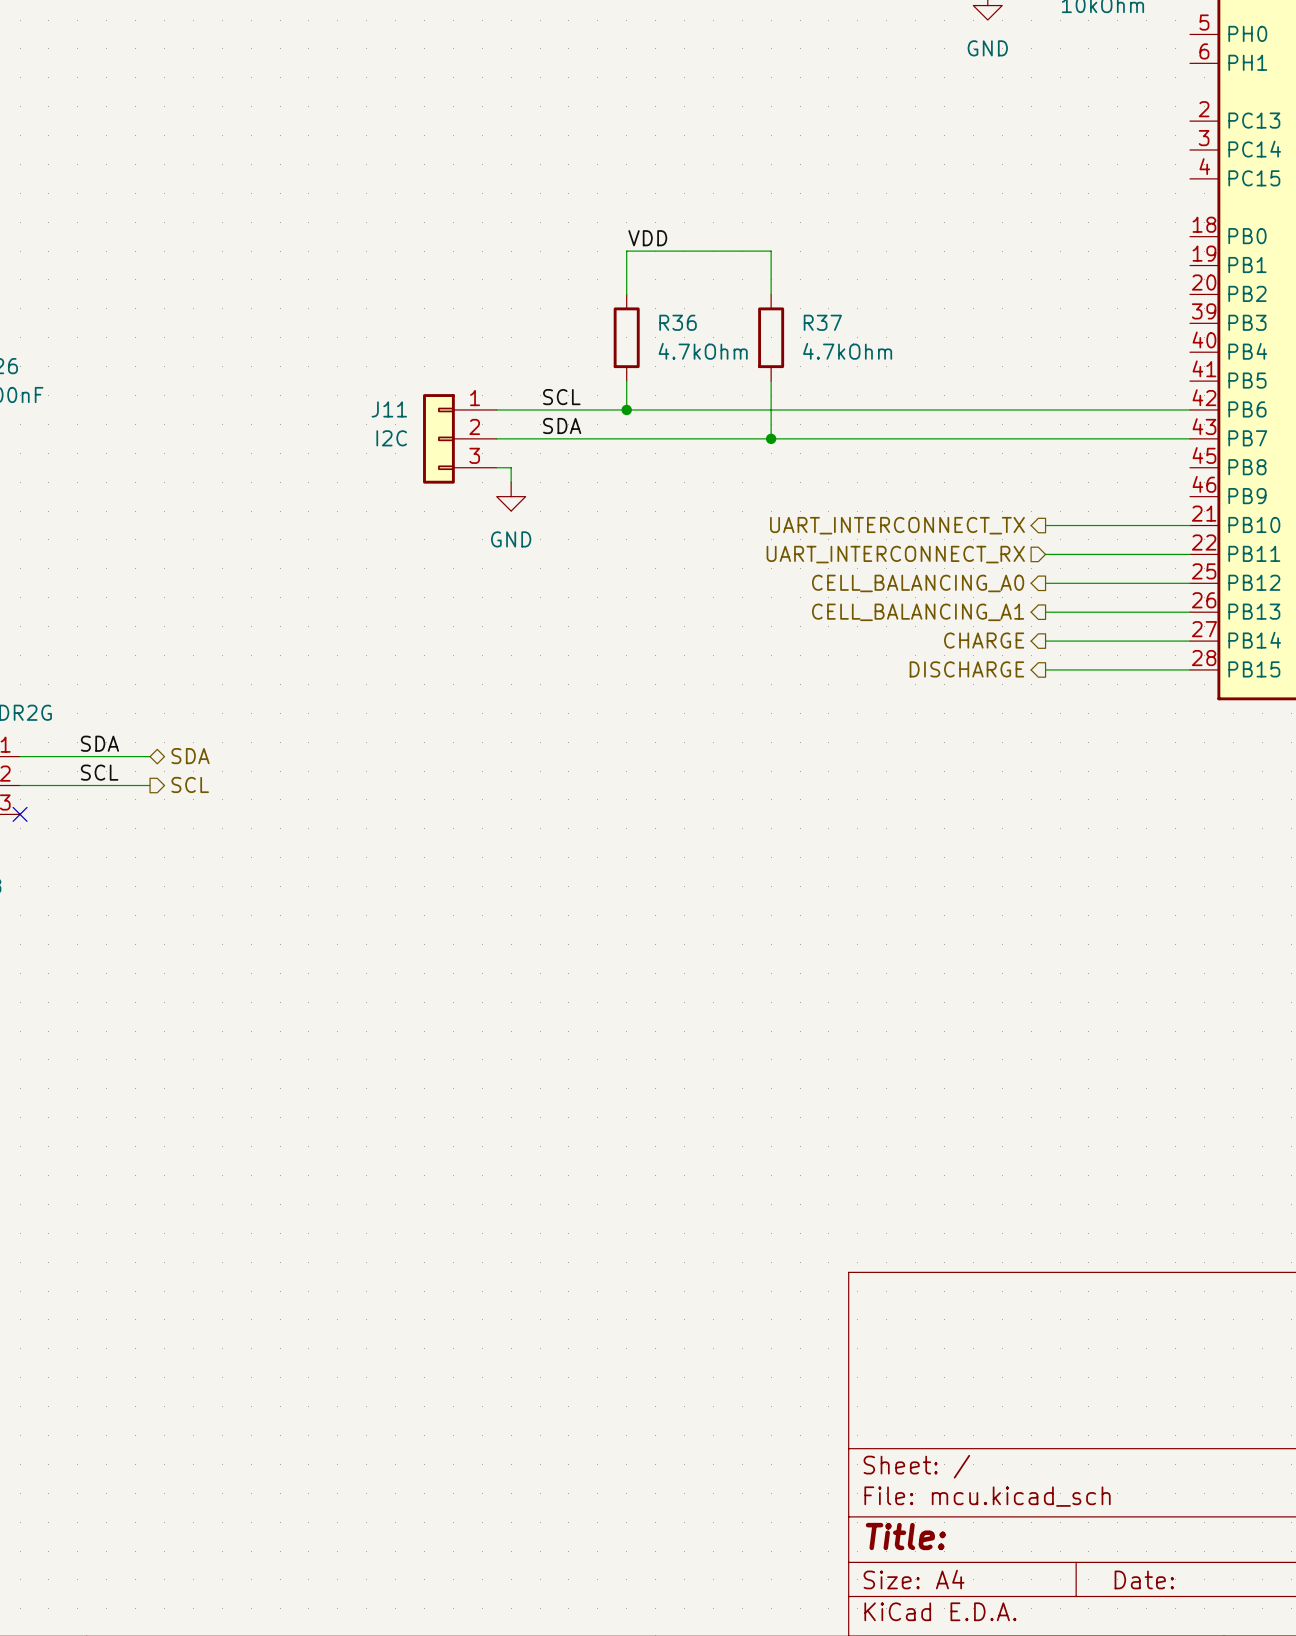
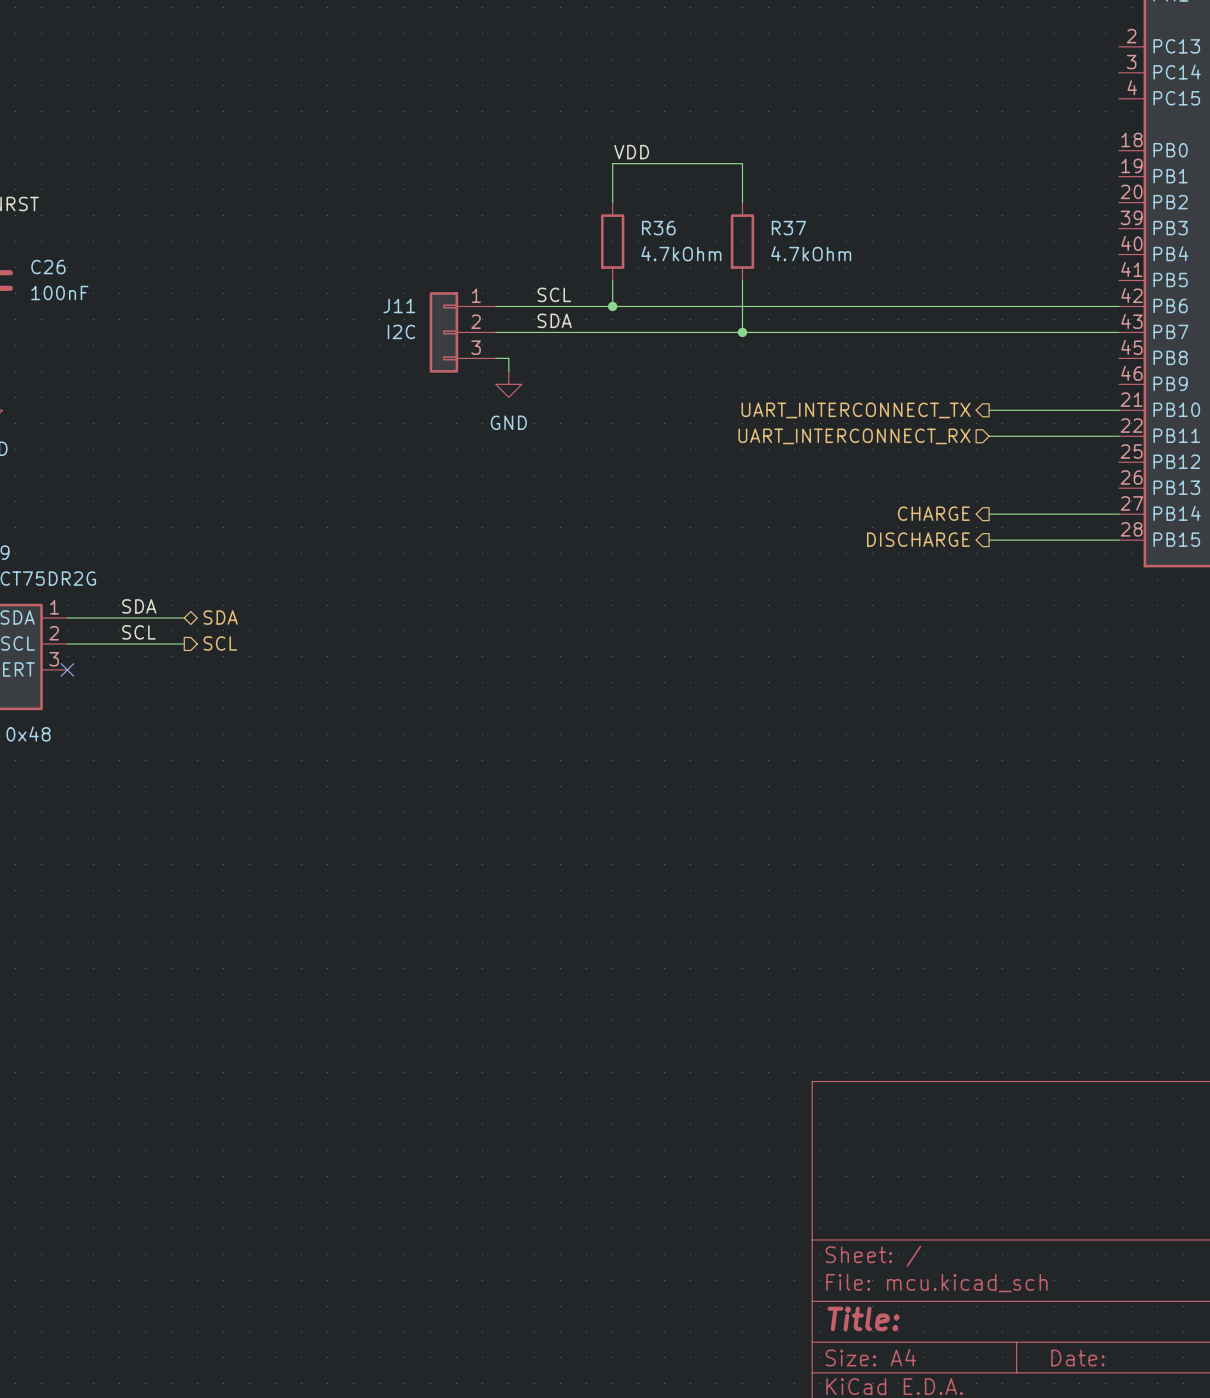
hierarchical label: CELL_BALANCING_A0 (918, 583) -> none
wire: (1045, 583) (1189, 583) -> none
hierarchical label: CELL_BALANCING_A1 (918, 612) -> none
wire: (1045, 612) (1189, 612) -> none

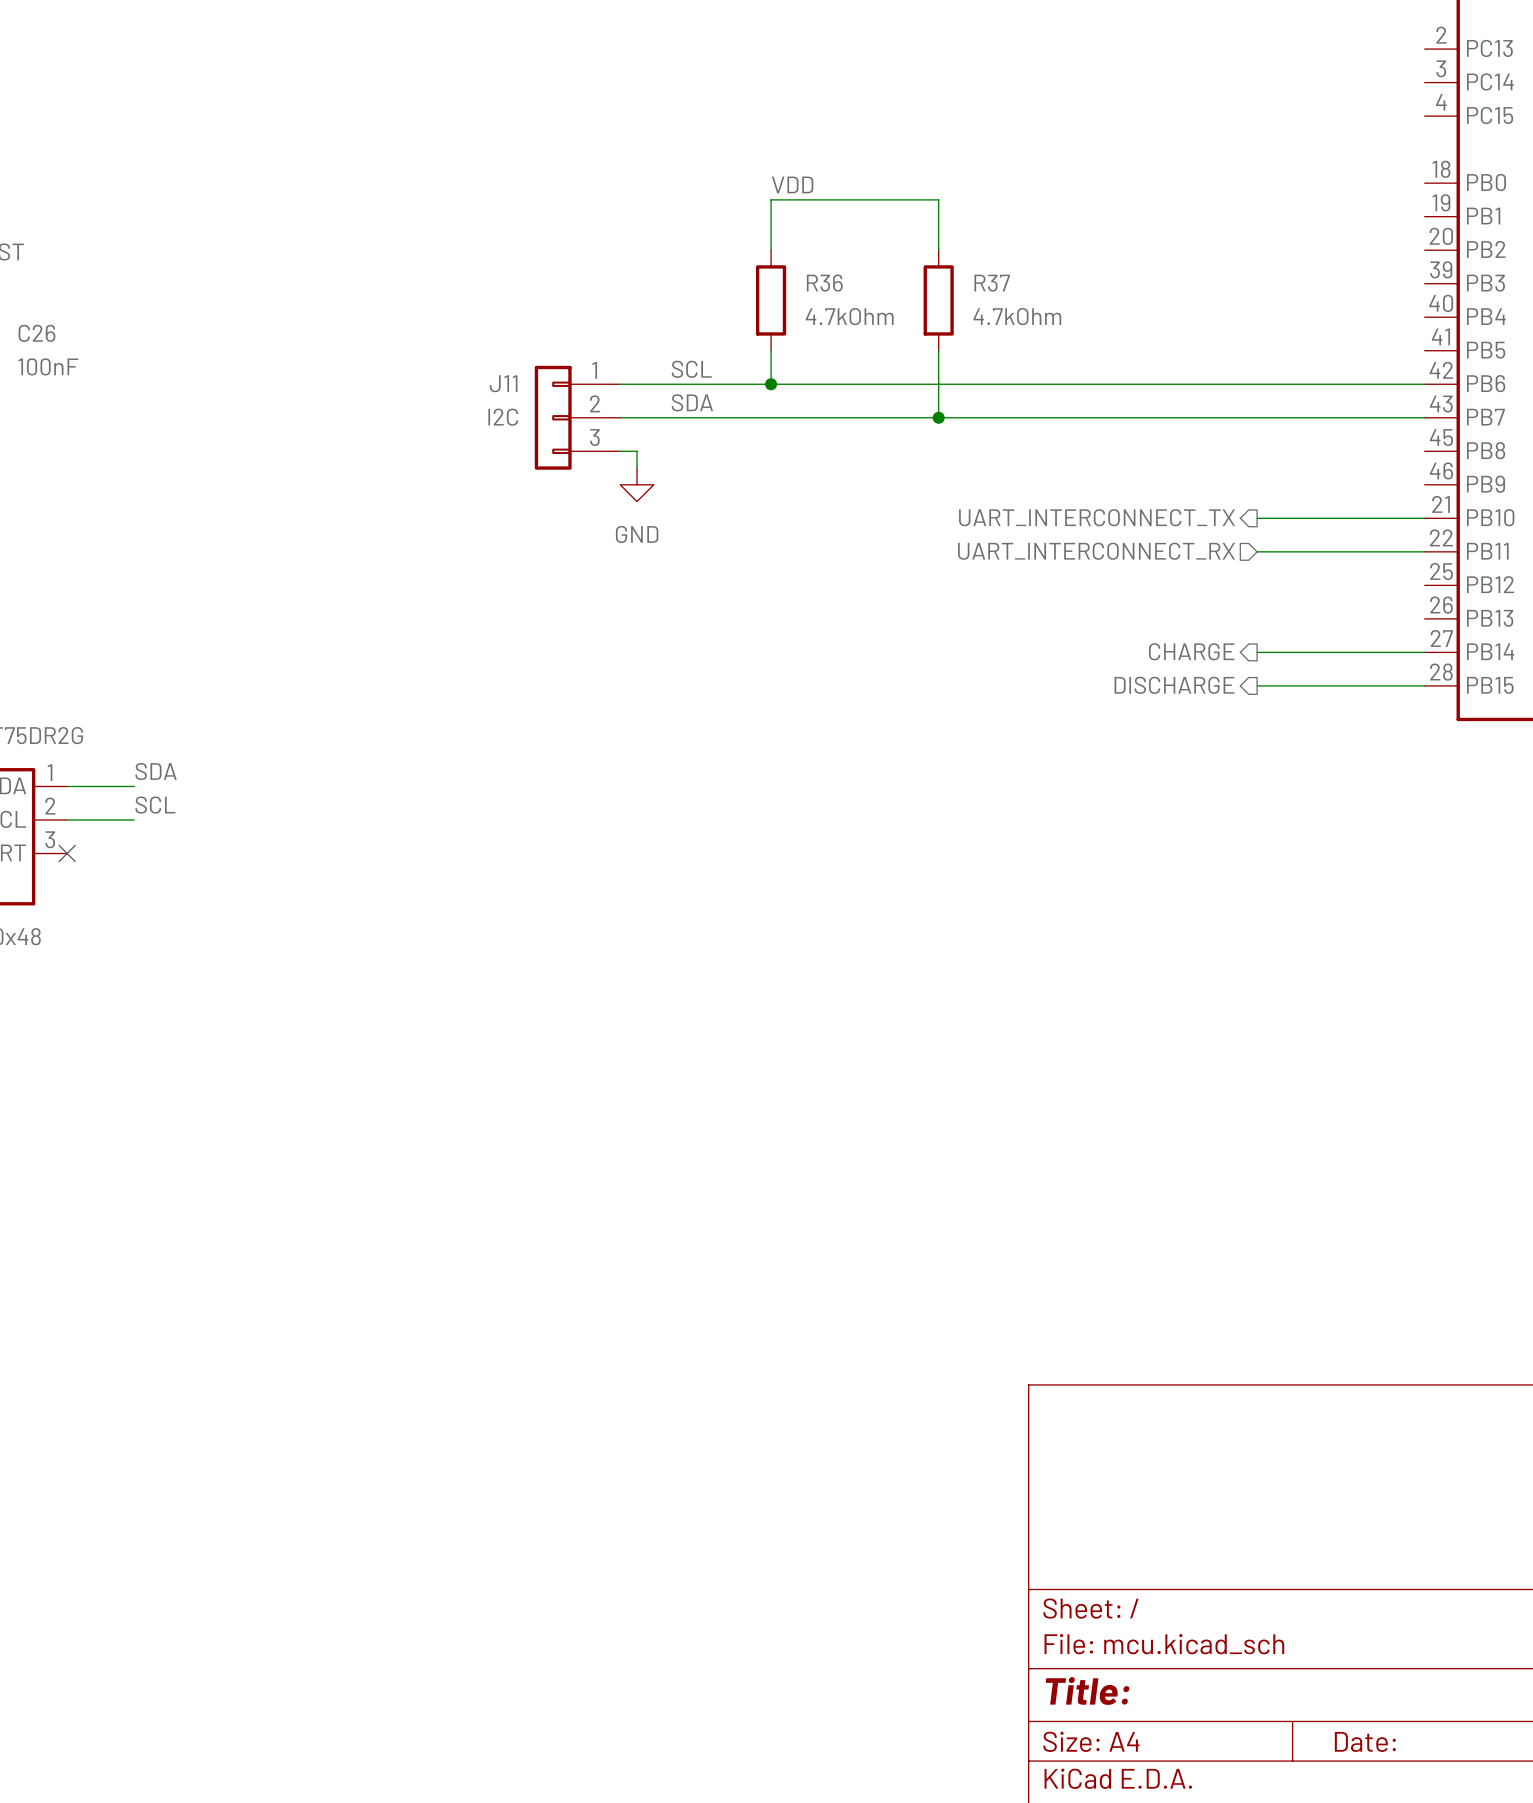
hierarchical label: SDA (220, 617) -> none
wire: (119, 618) (184, 618) -> none
wire: (119, 643) (184, 643) -> none
hierarchical label: SCL (220, 643) -> none

